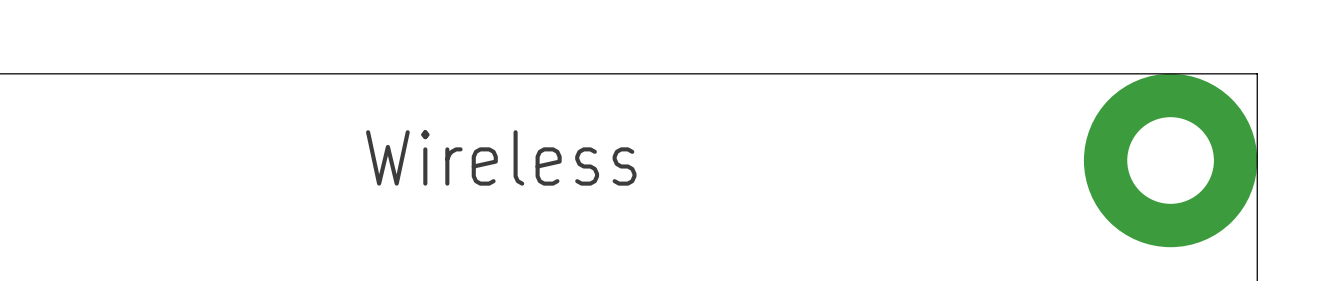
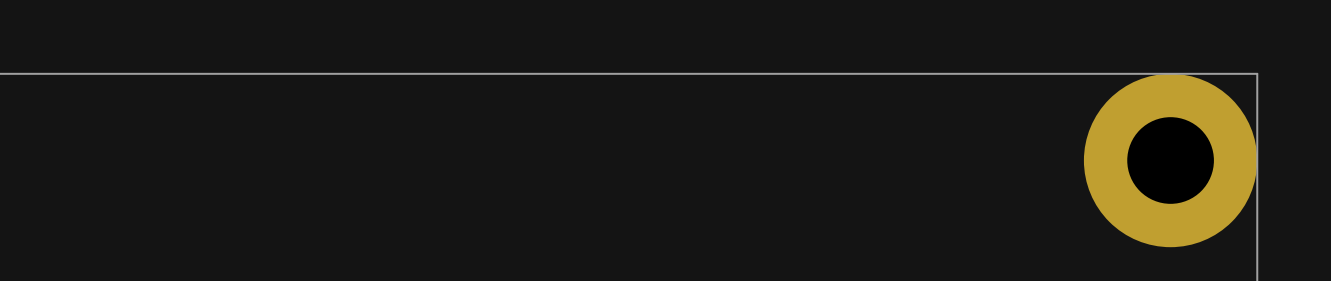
text: Wireless (501, 157) -> none

